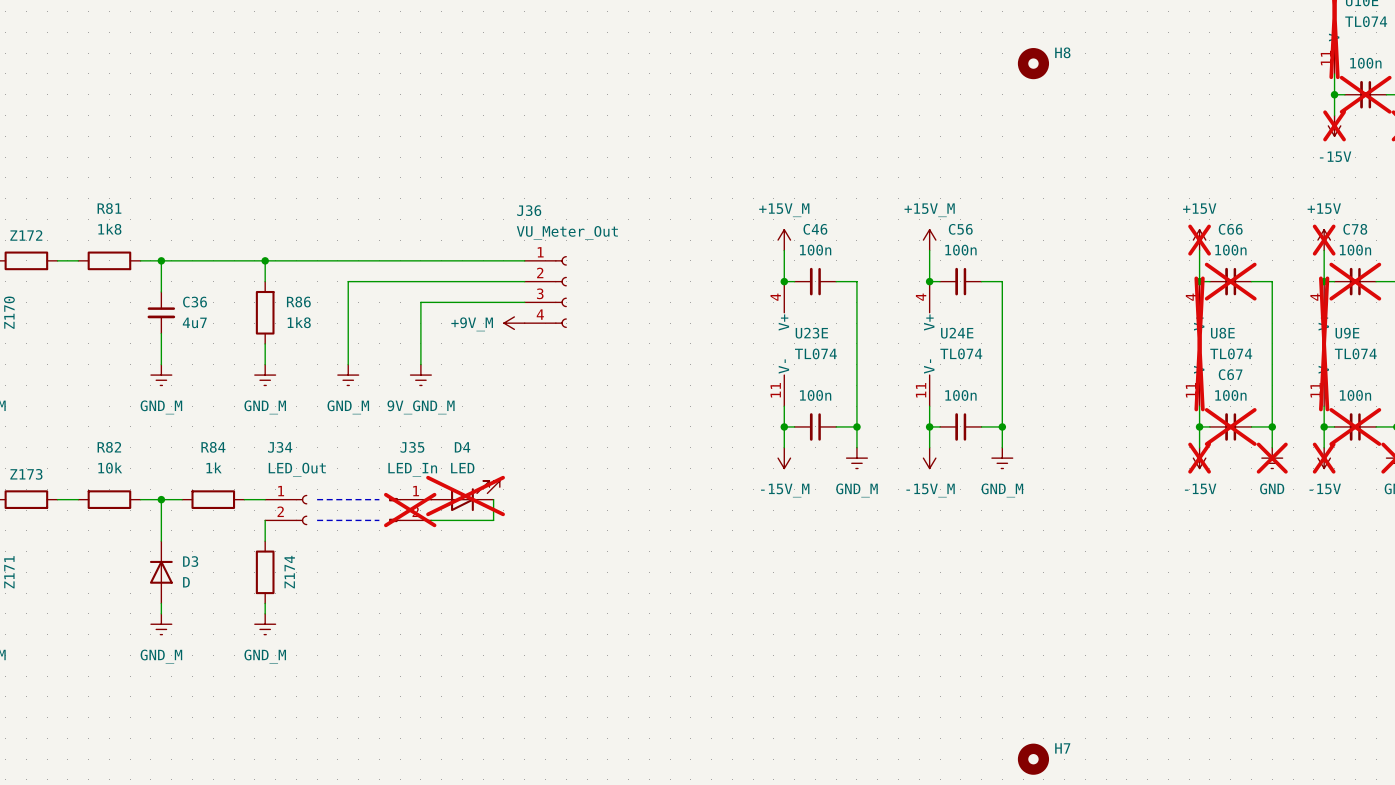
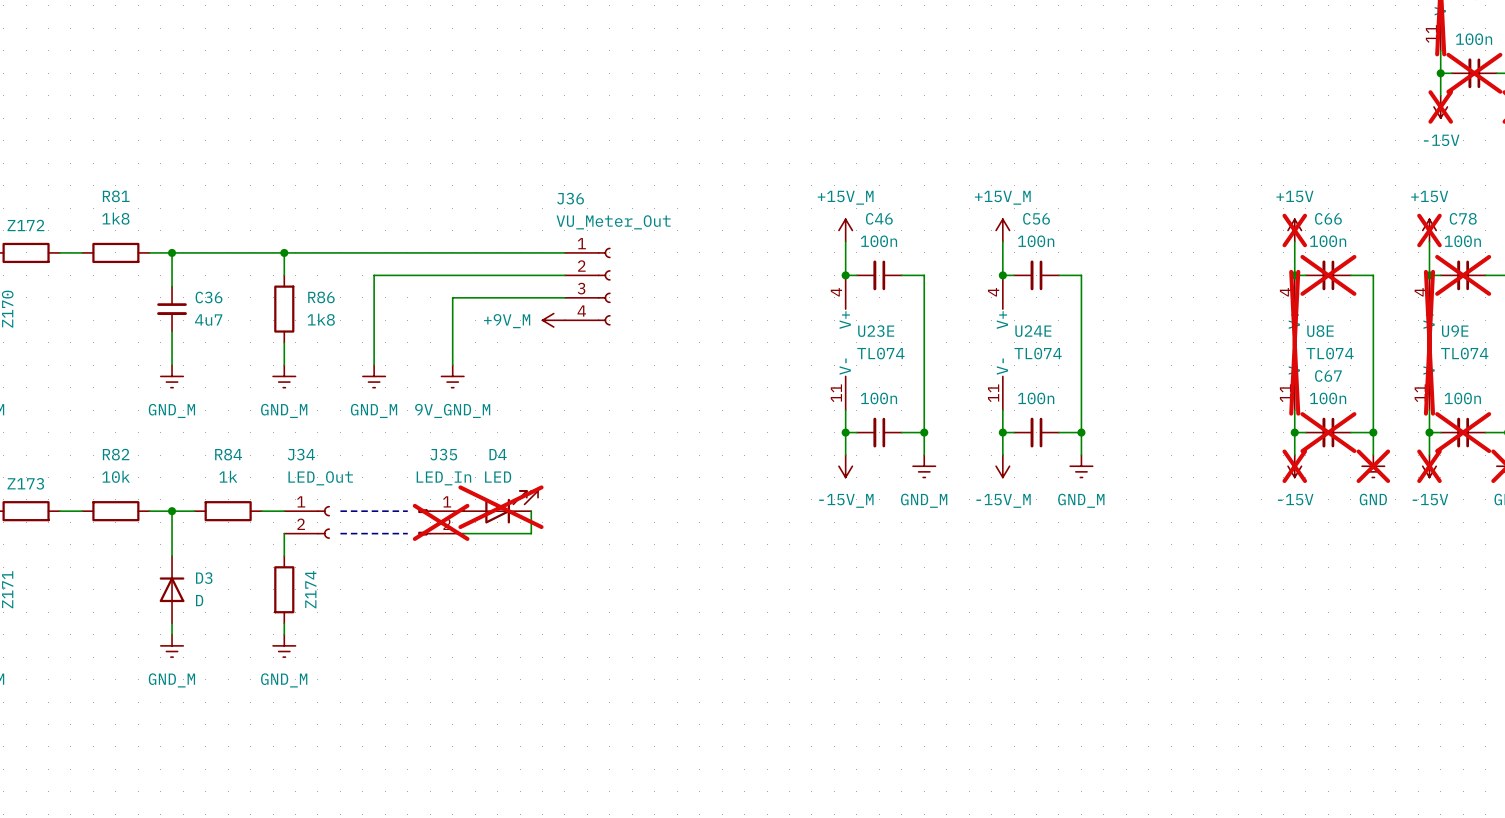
H8: (1033, 63) -> none
H7: (1033, 759) -> none

